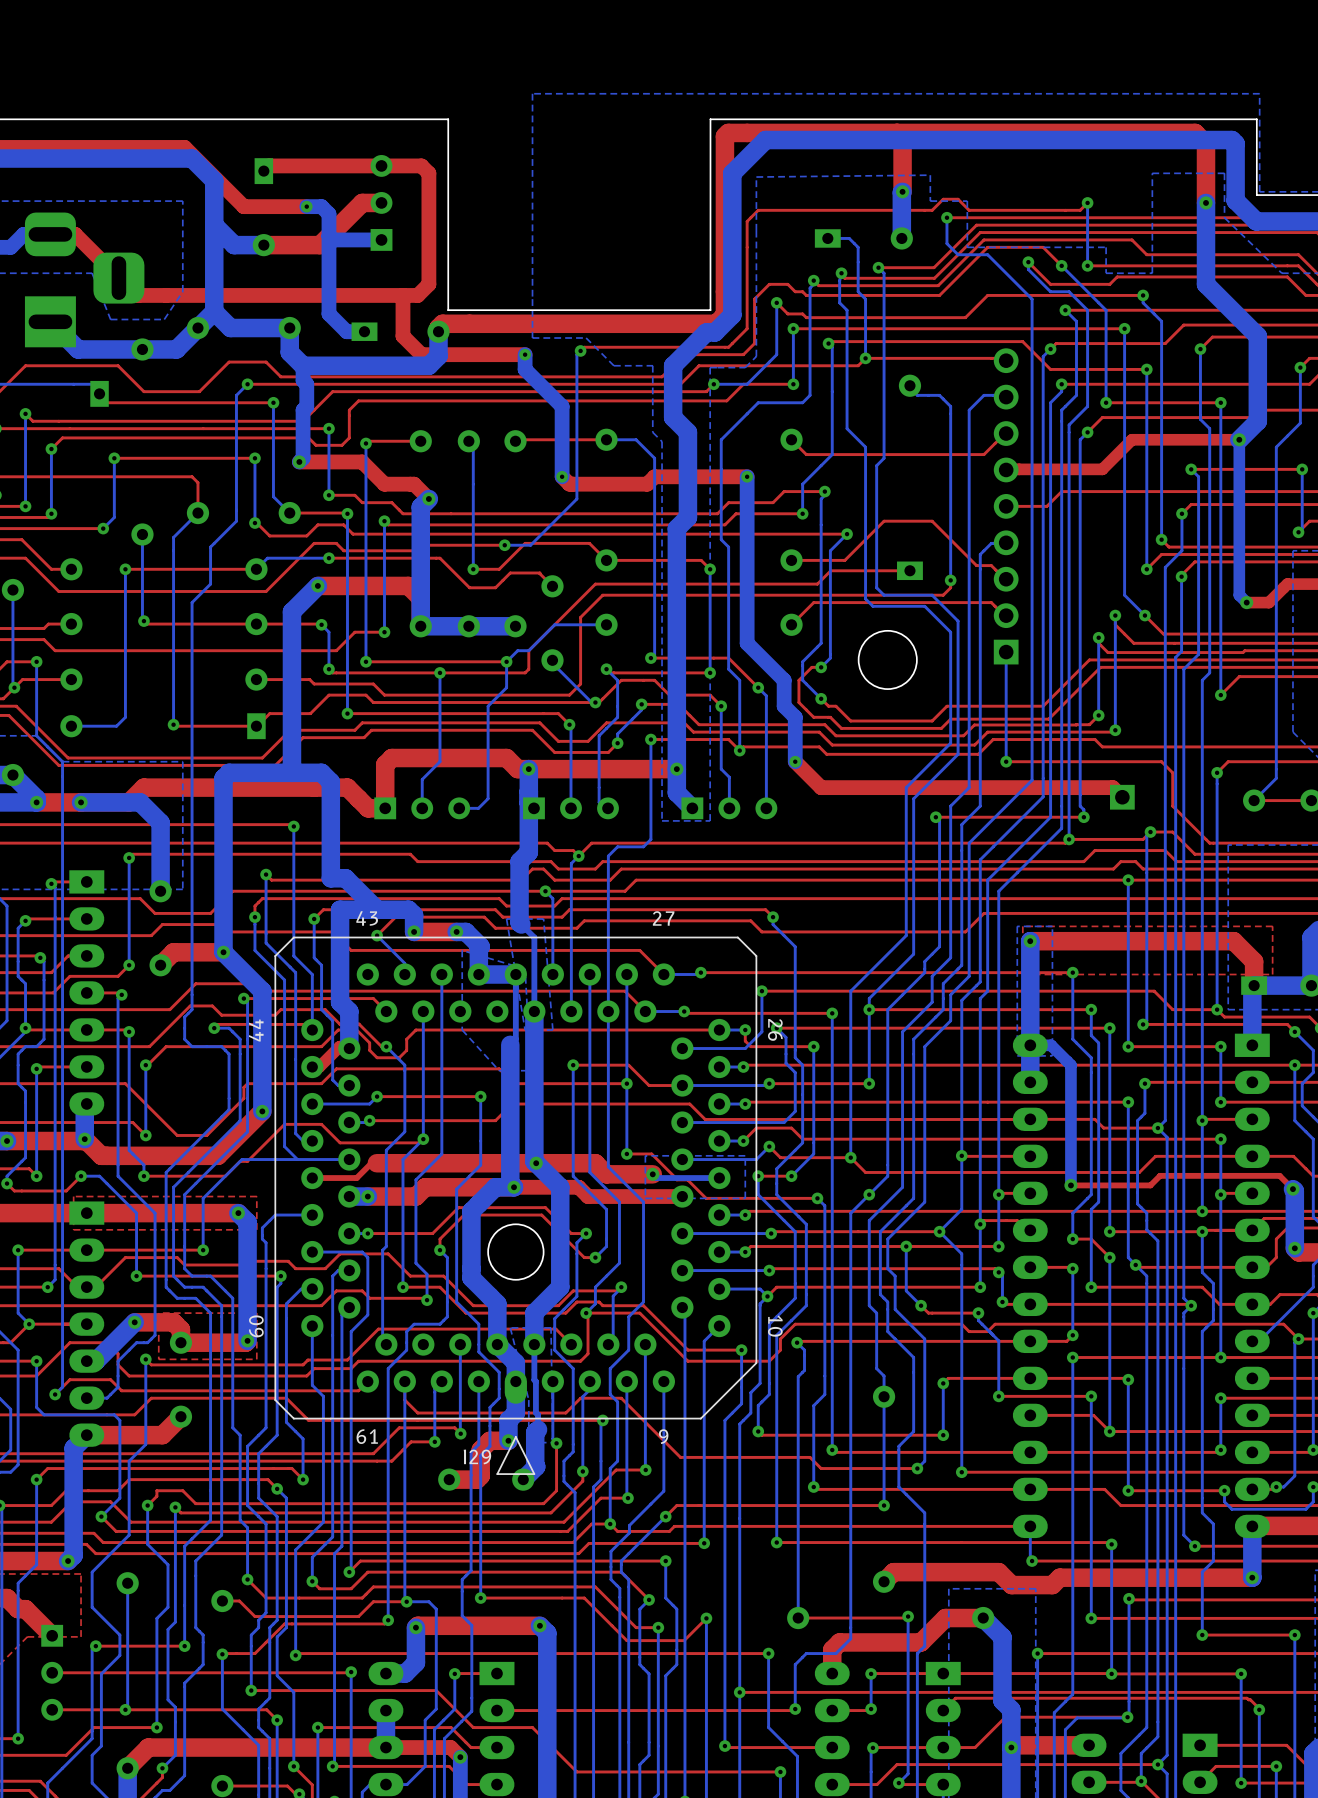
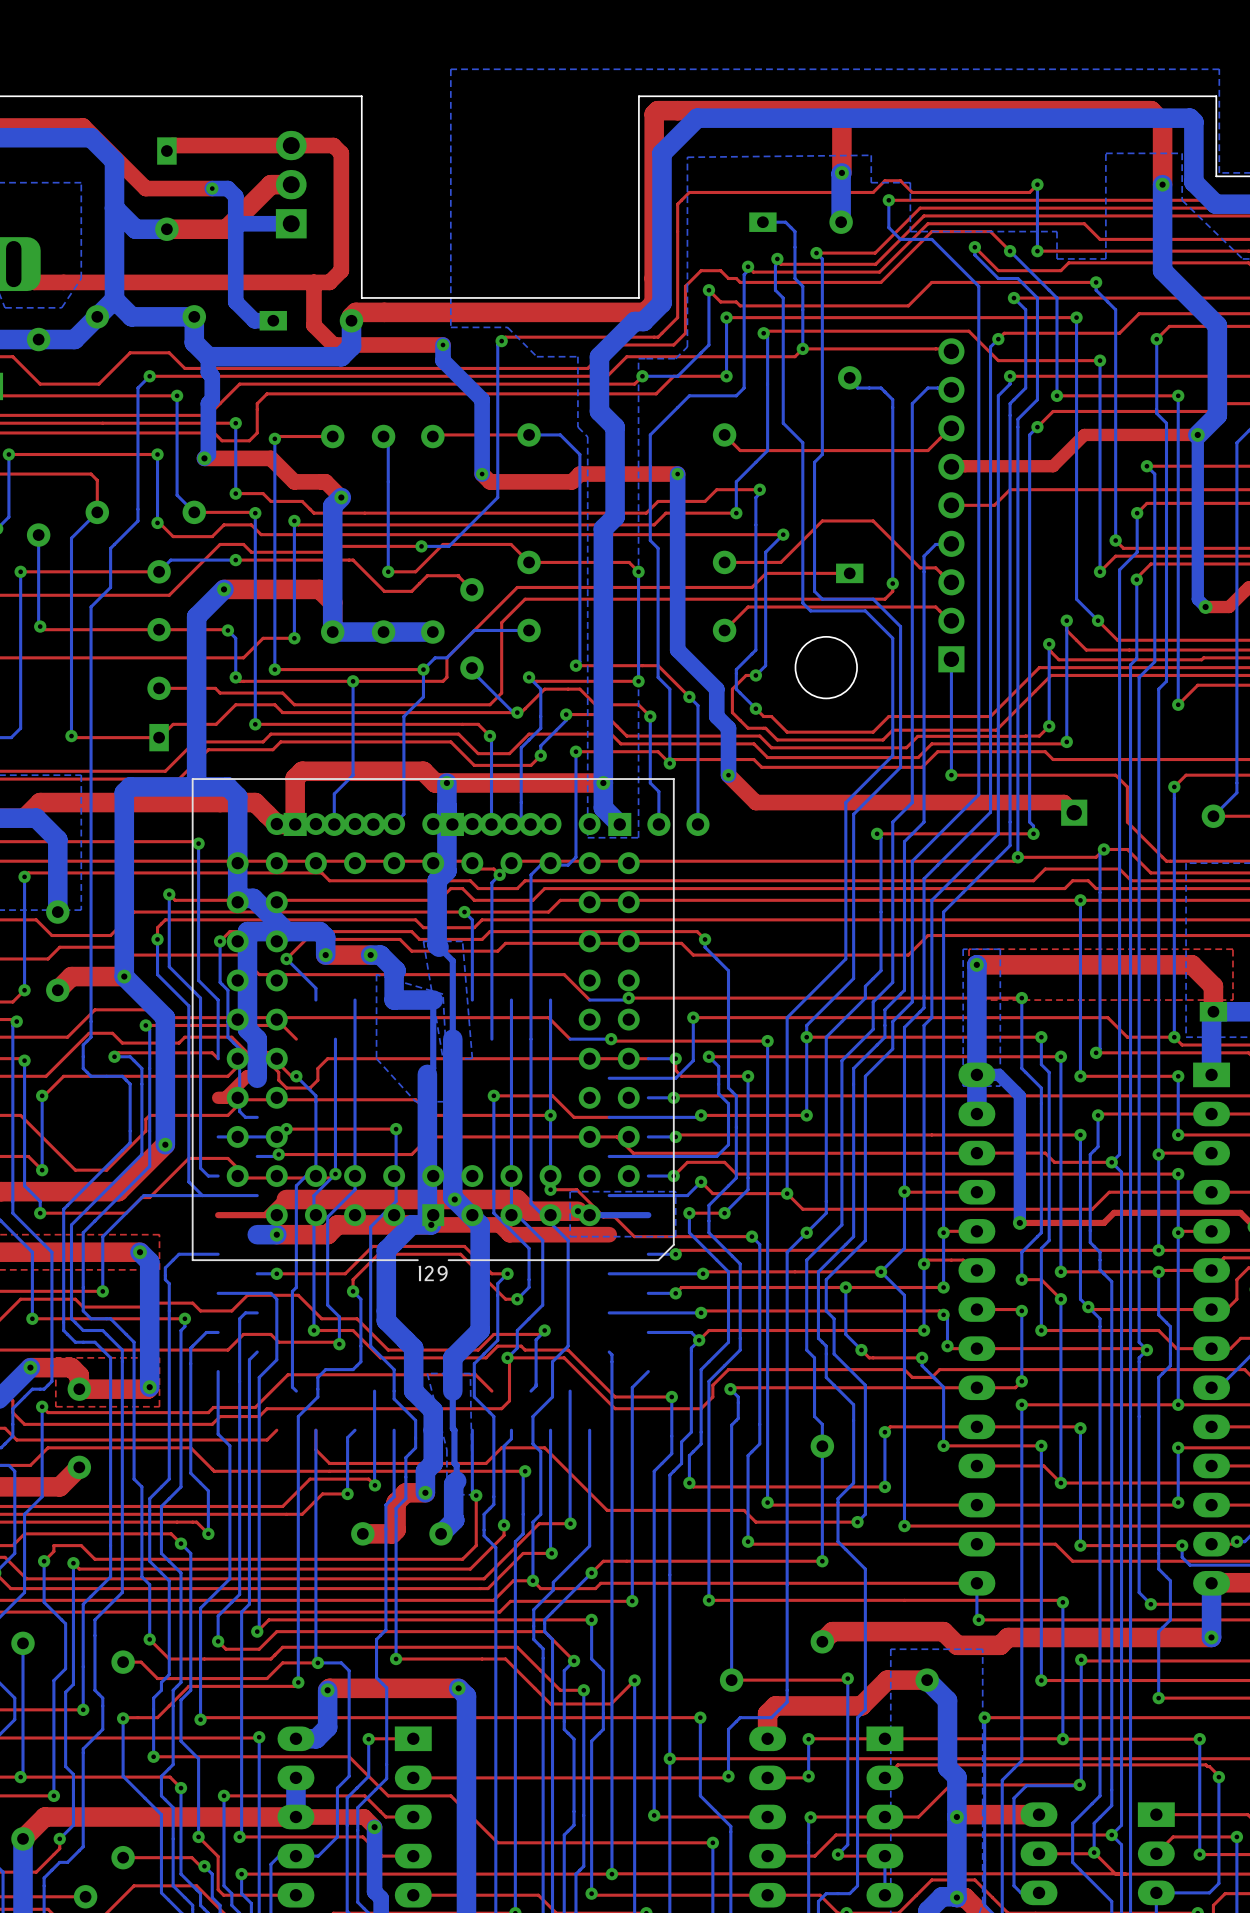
part footprint: [370, 155, 393, 251] -> [275, 130, 307, 239]
I29 footprint: [274, 936, 758, 1475] -> [191, 778, 675, 1262]
I29 name position: I29 (477, 1456) -> I29 (433, 1273)

